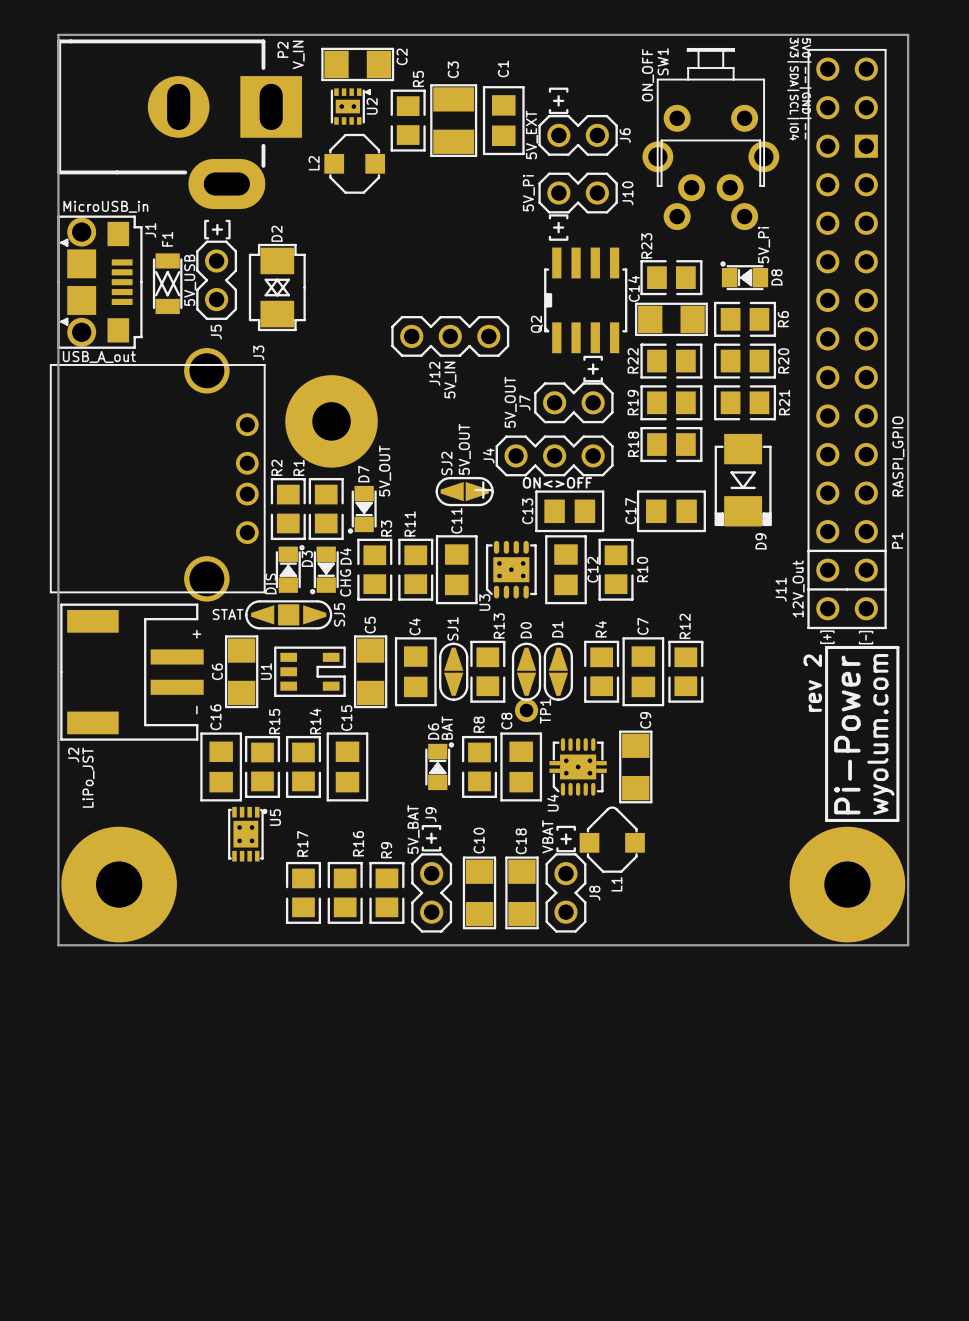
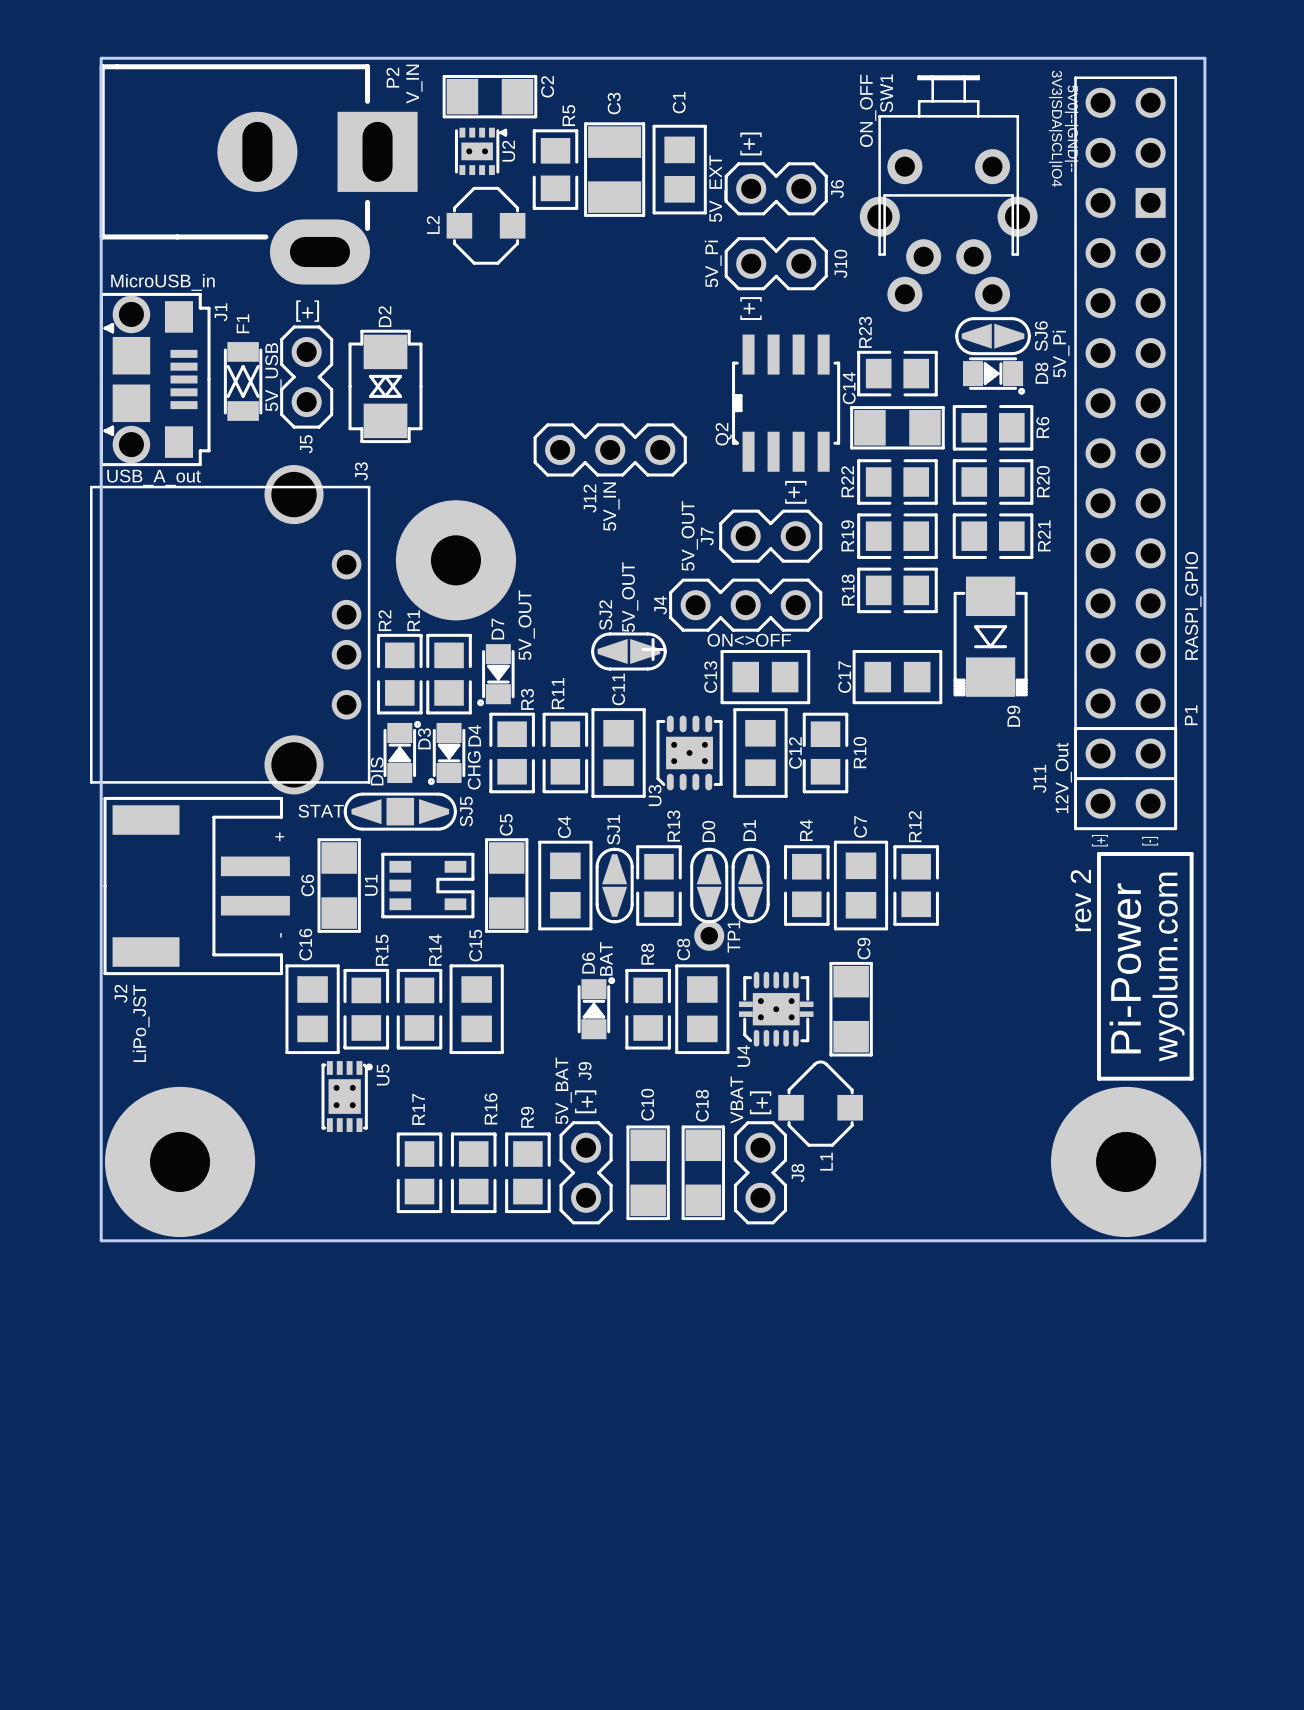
D8 value: 5V_Pi (764, 245) -> none
SJ6: none -> 5V_Pi (993, 336)
D8 rotation: 0° (744, 275) -> 180° (994, 376)

